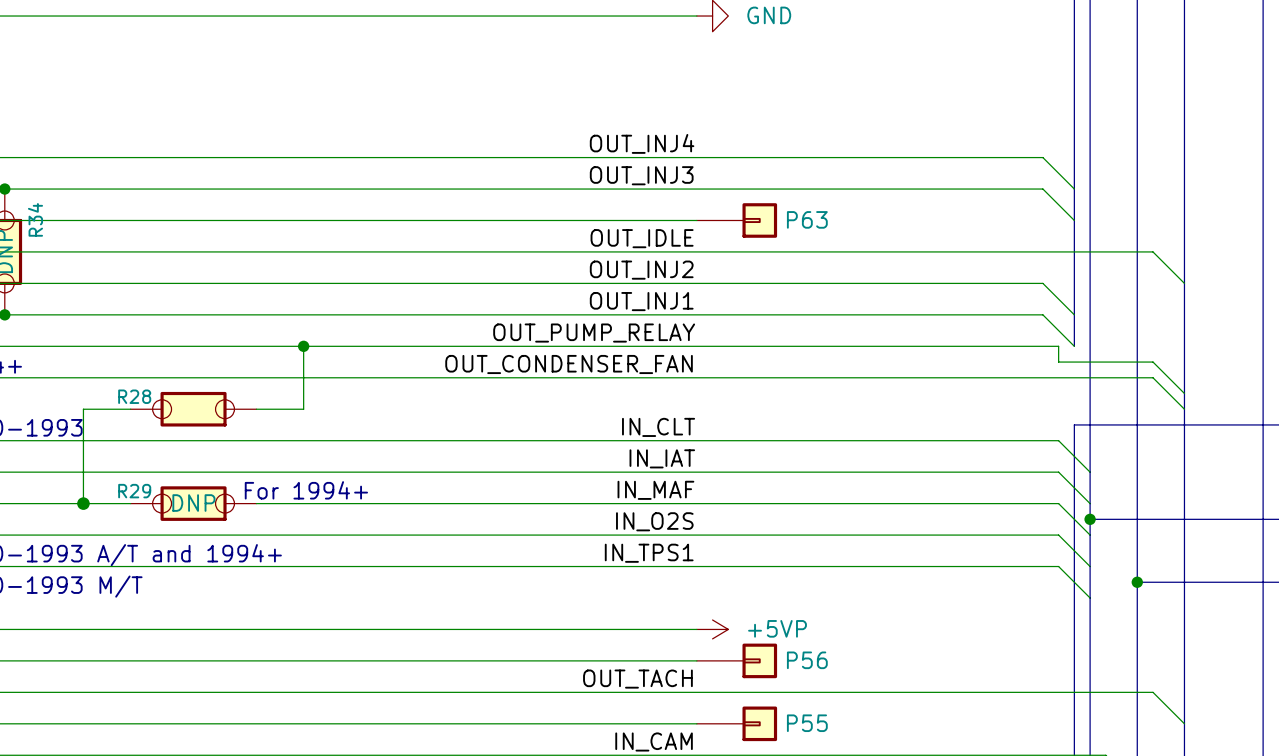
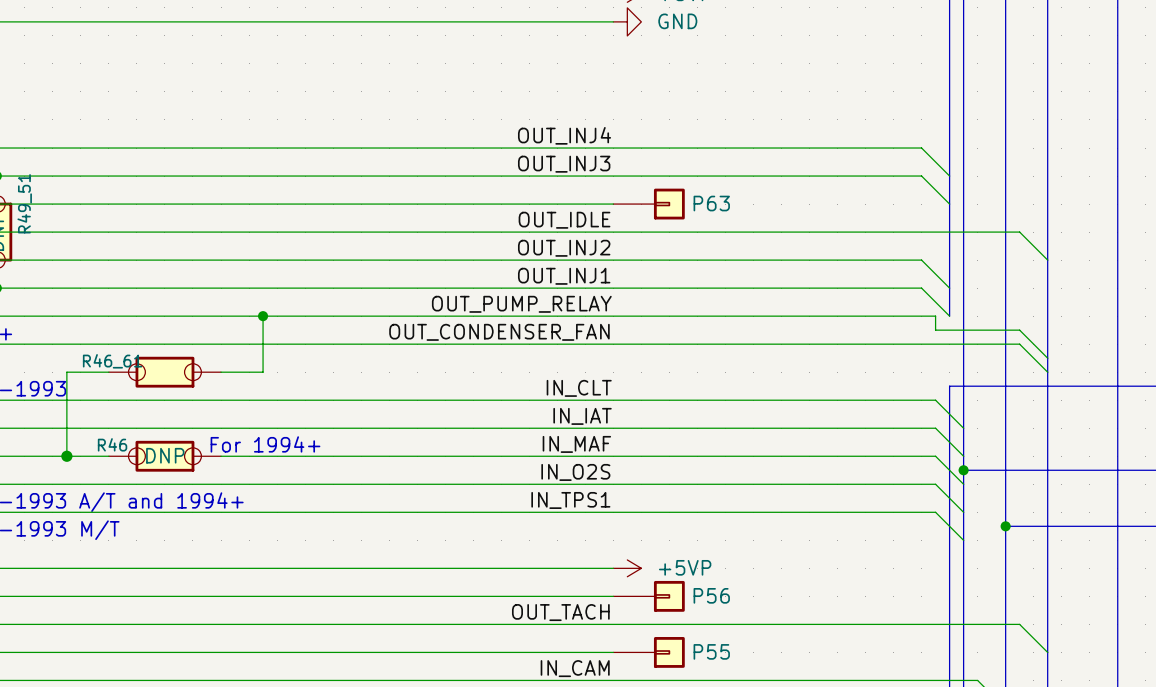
R34 name: R34 (35, 219) -> R49_51 (24, 203)
R28 name: R28 (134, 396) -> R46_61 (112, 361)
R29 name: R29 (134, 491) -> R46 (112, 444)

